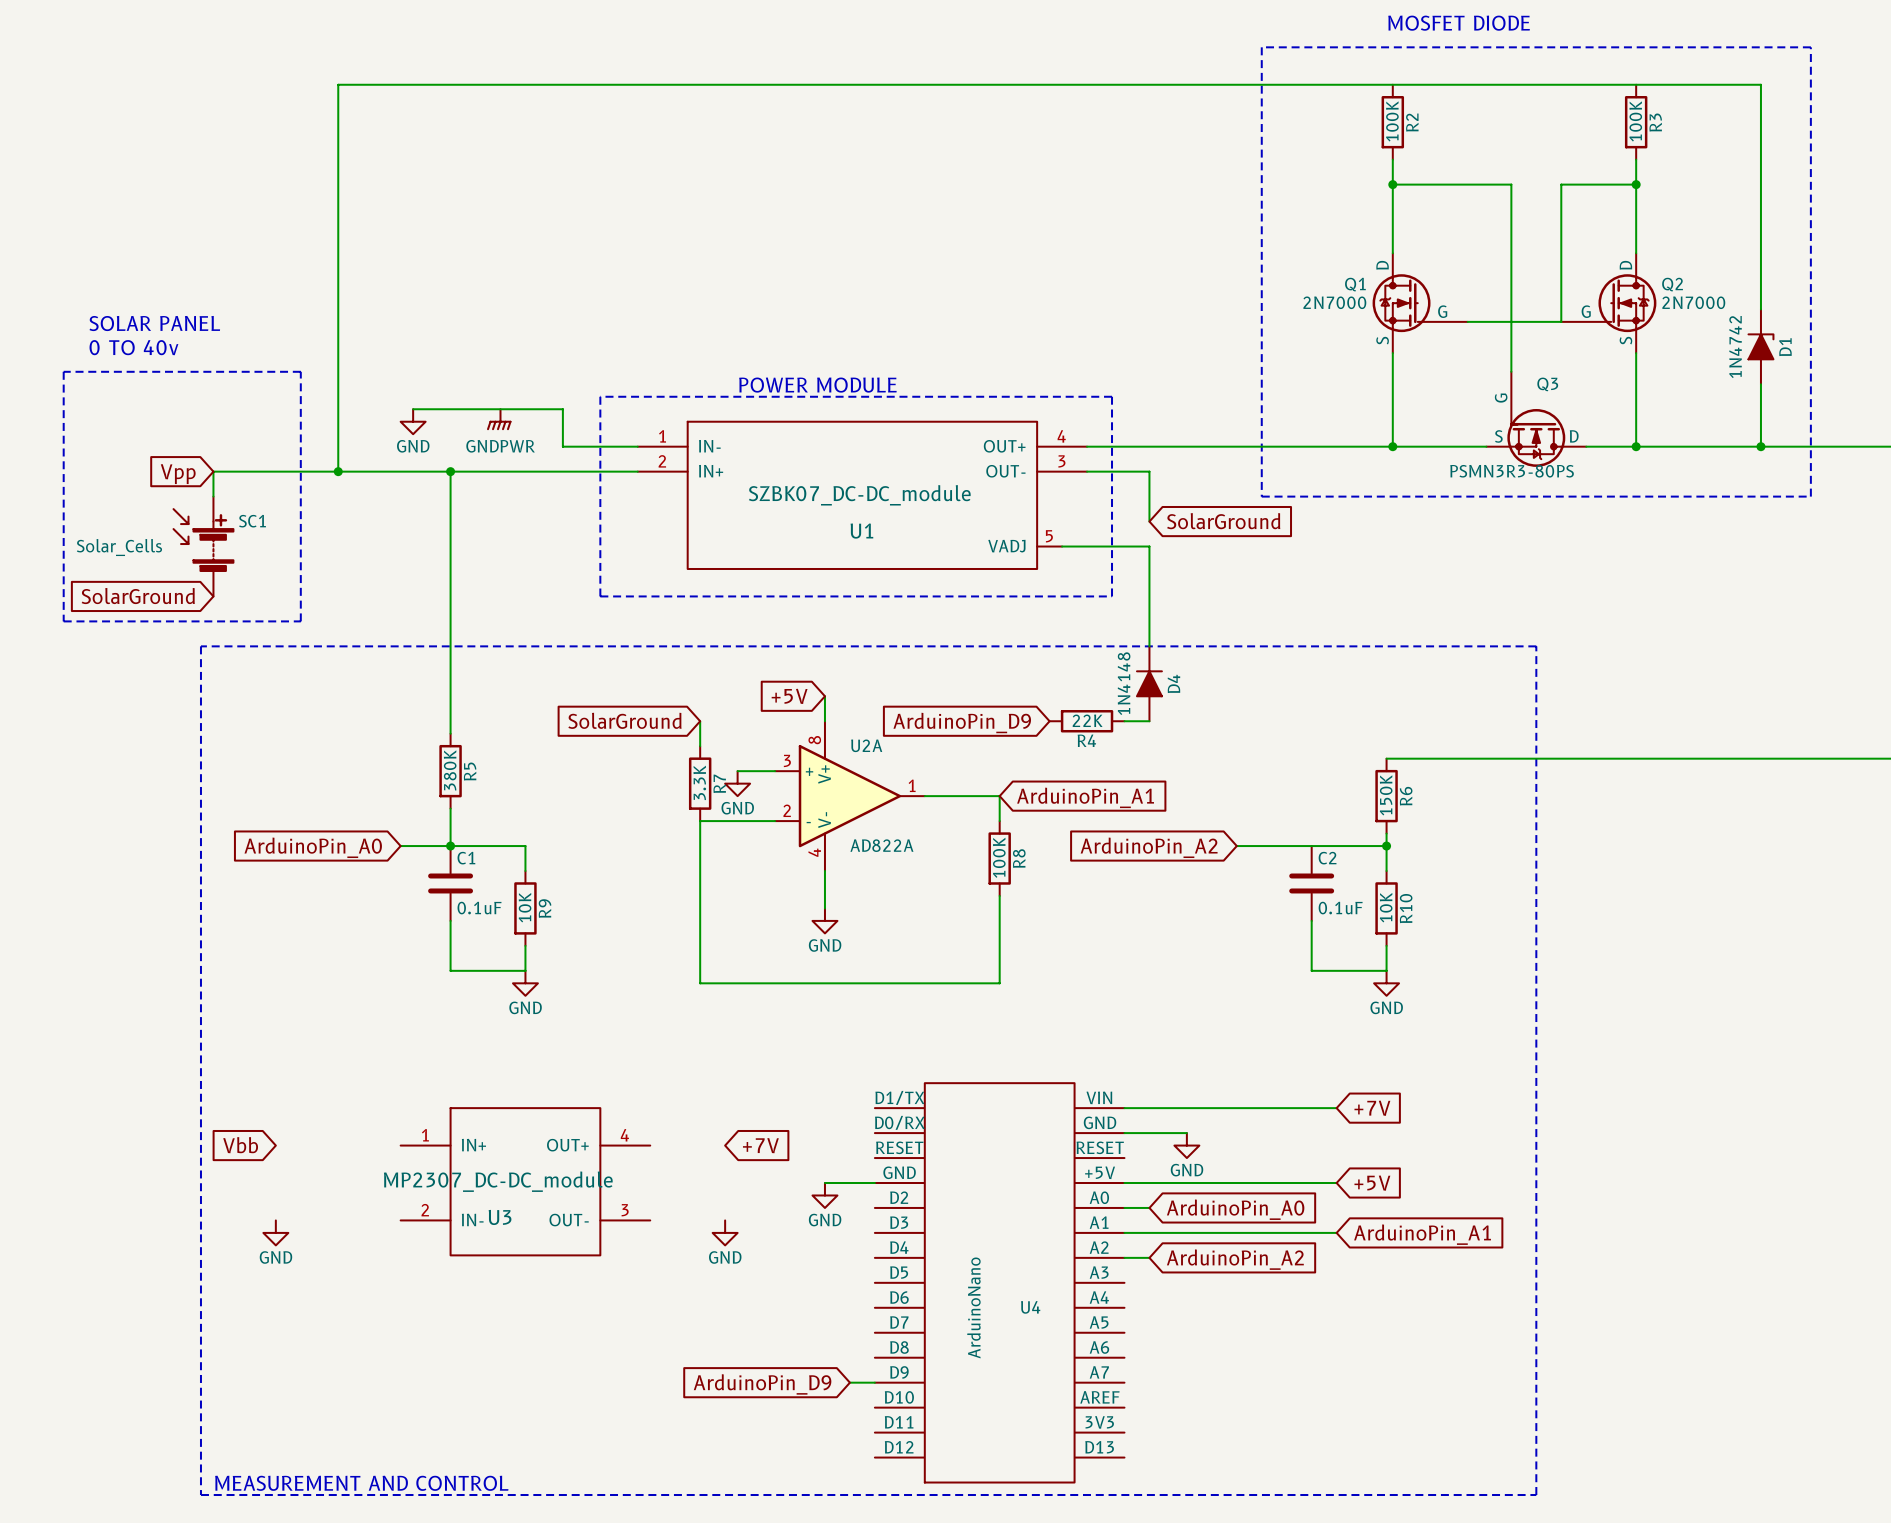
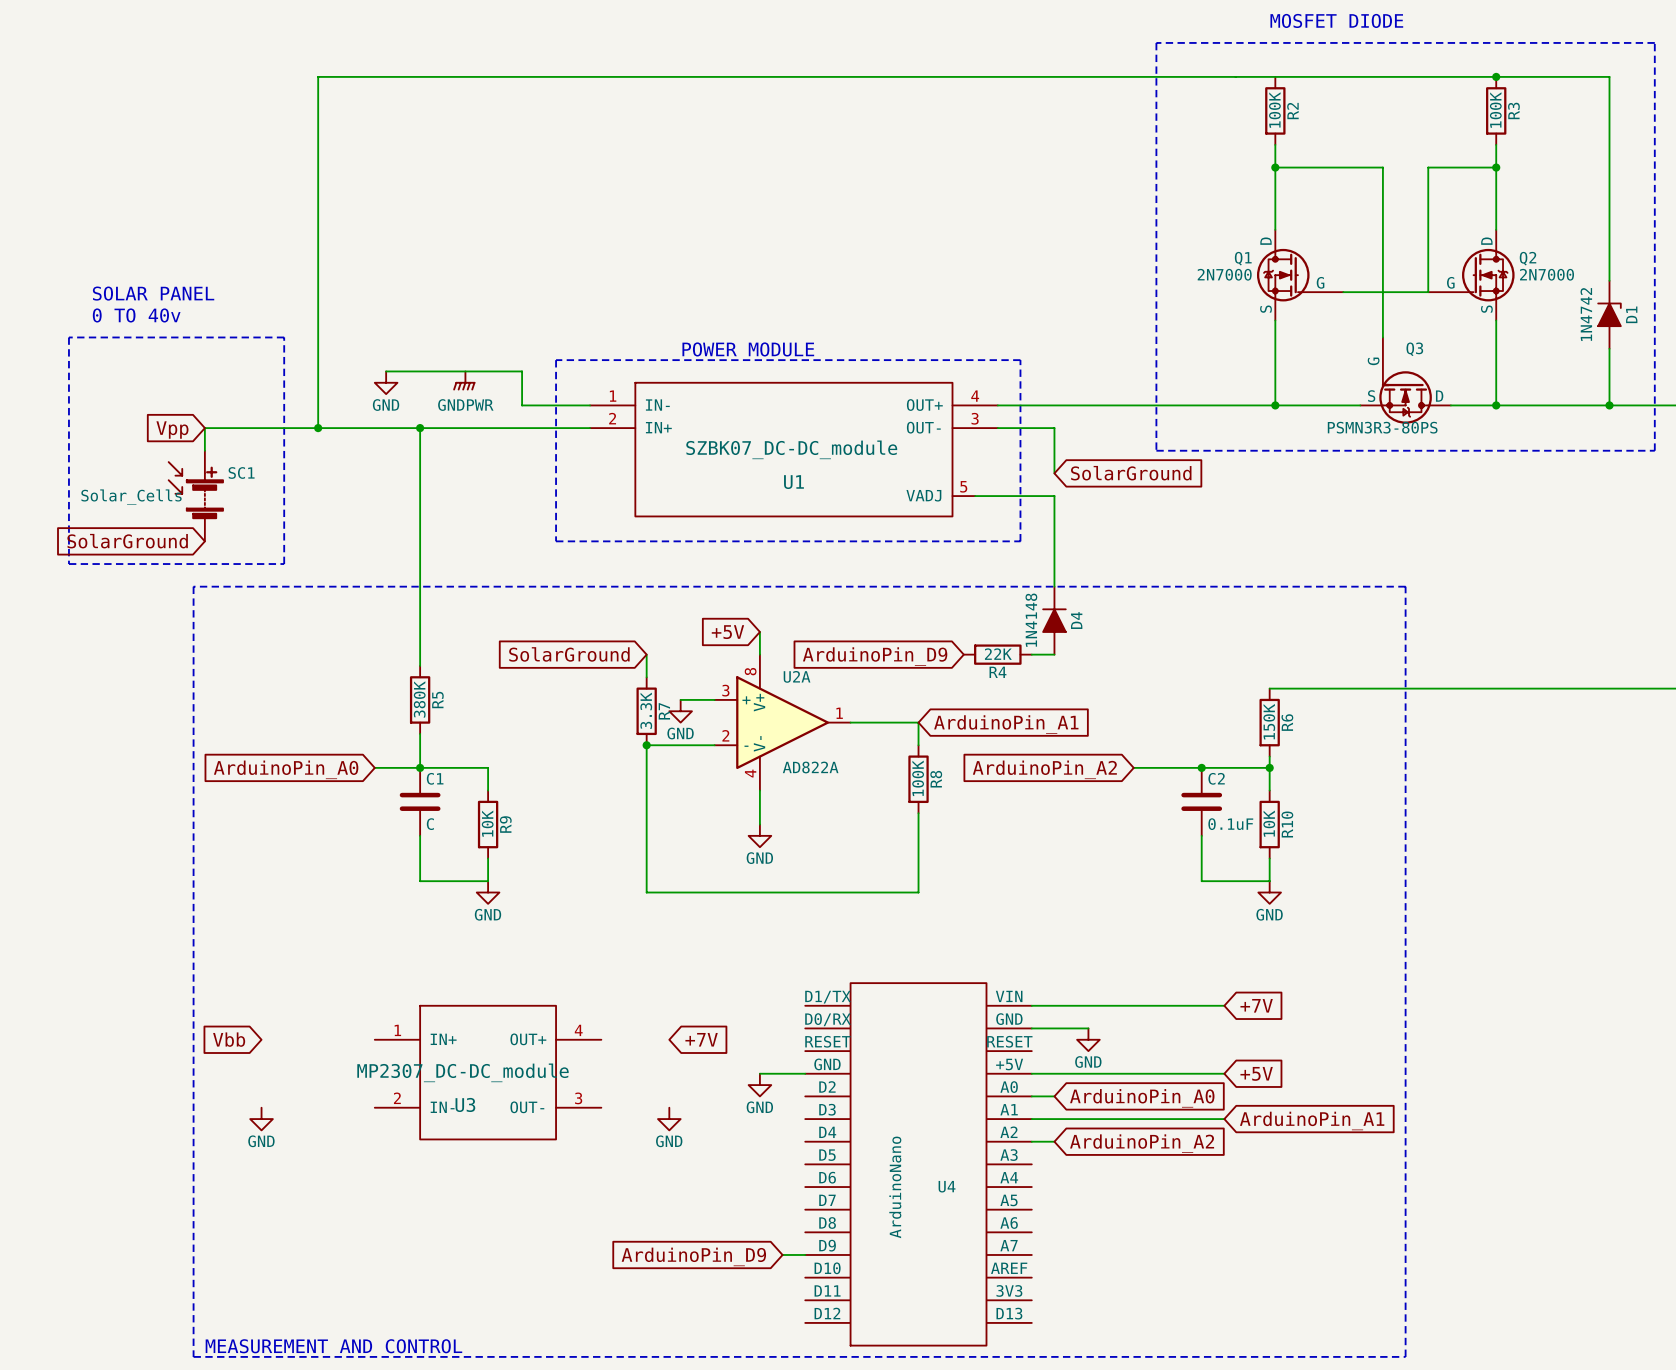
junction: none -> (1496, 76)
junction: none -> (646, 745)
junction: none -> (1201, 767)
C1 value: 0.1uF (479, 908) -> C (430, 824)

